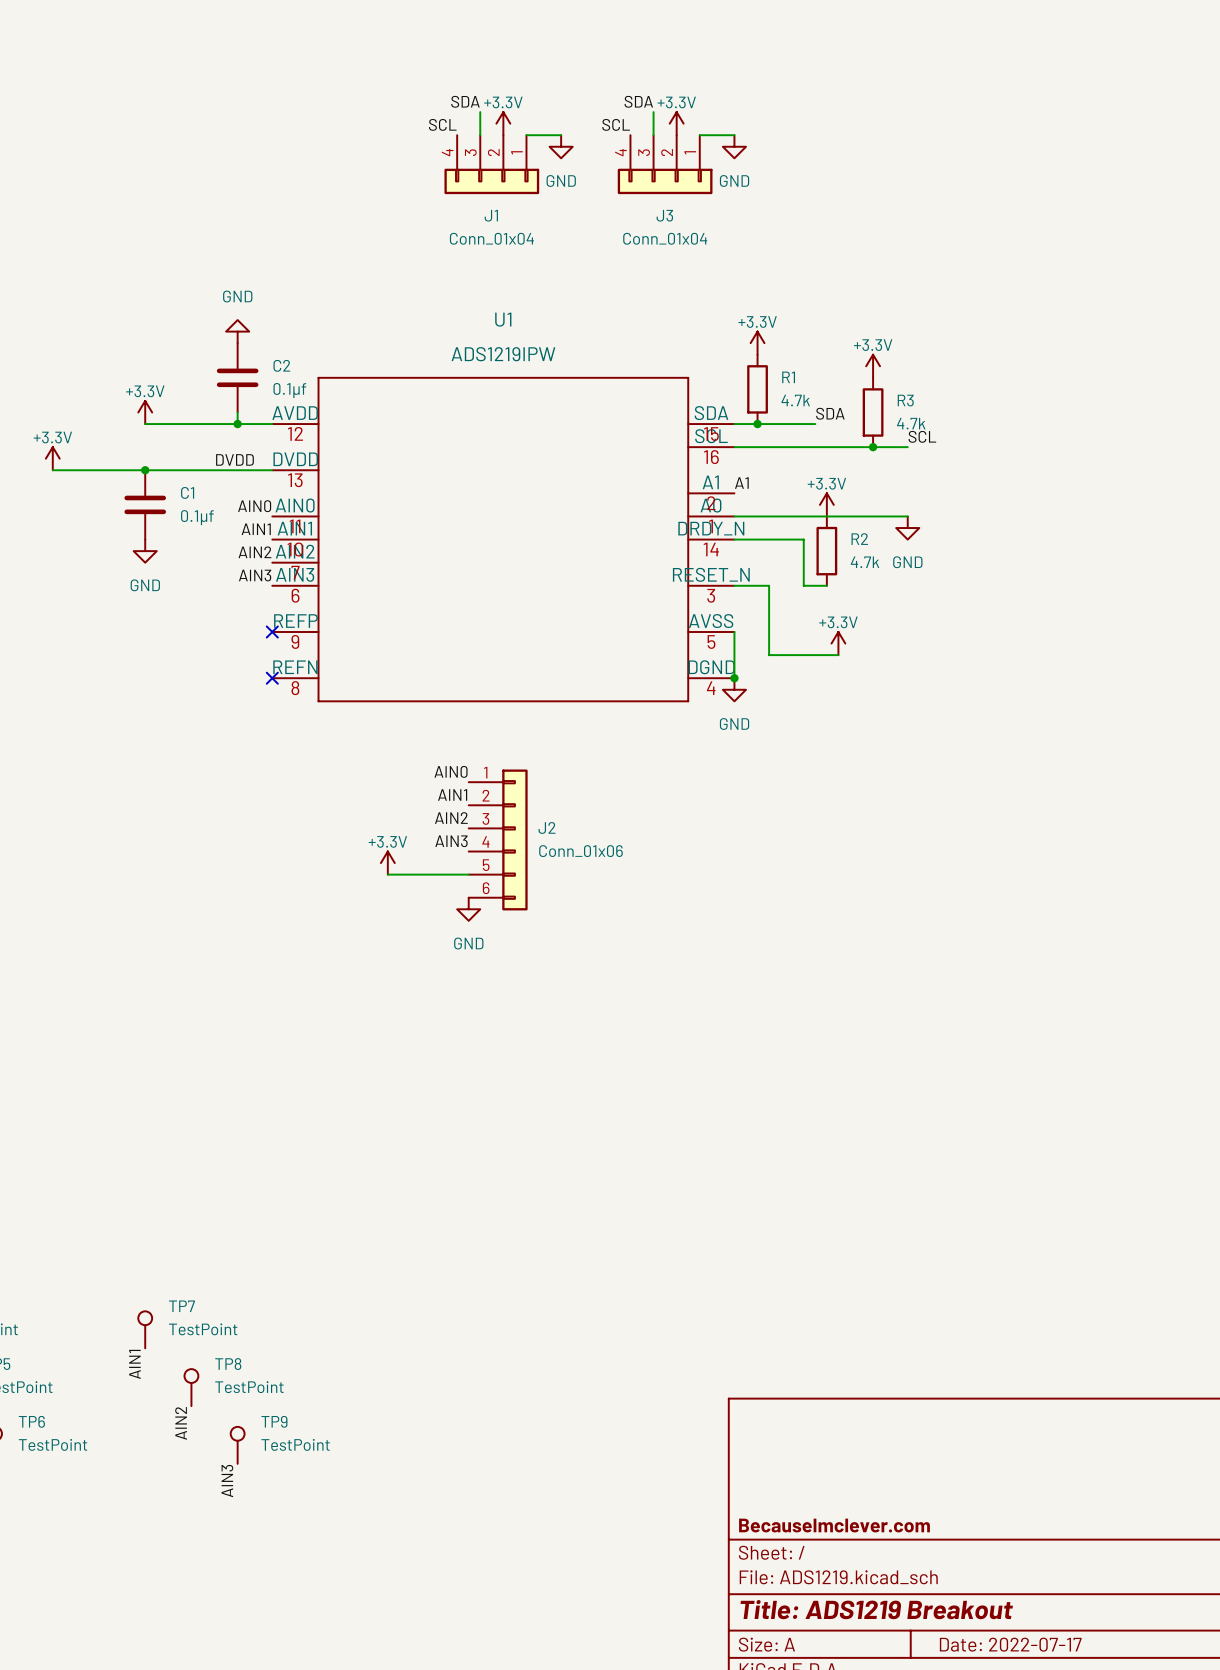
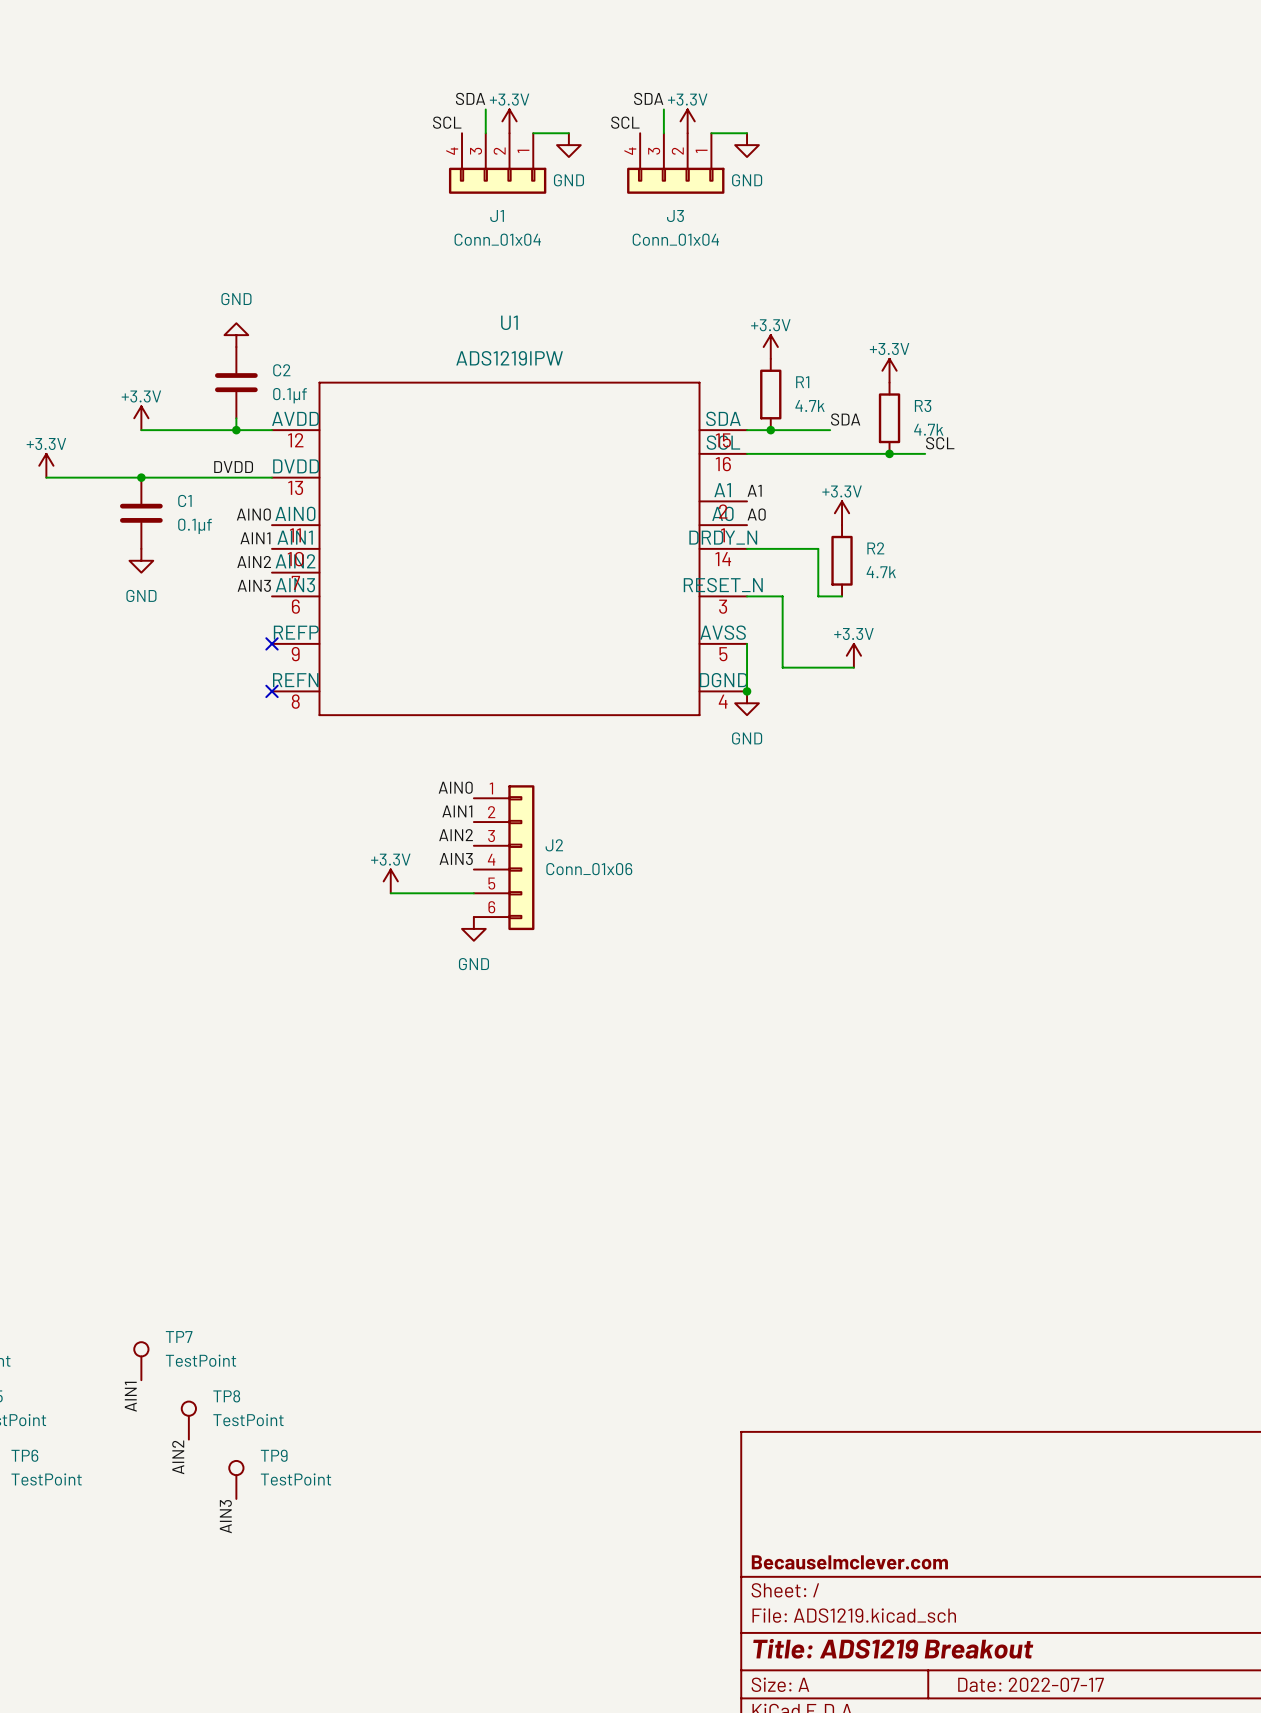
label: none -> A0 (756, 514)
wire: (734, 516) (907, 516) -> none
power symbol: GND (907, 528) -> none

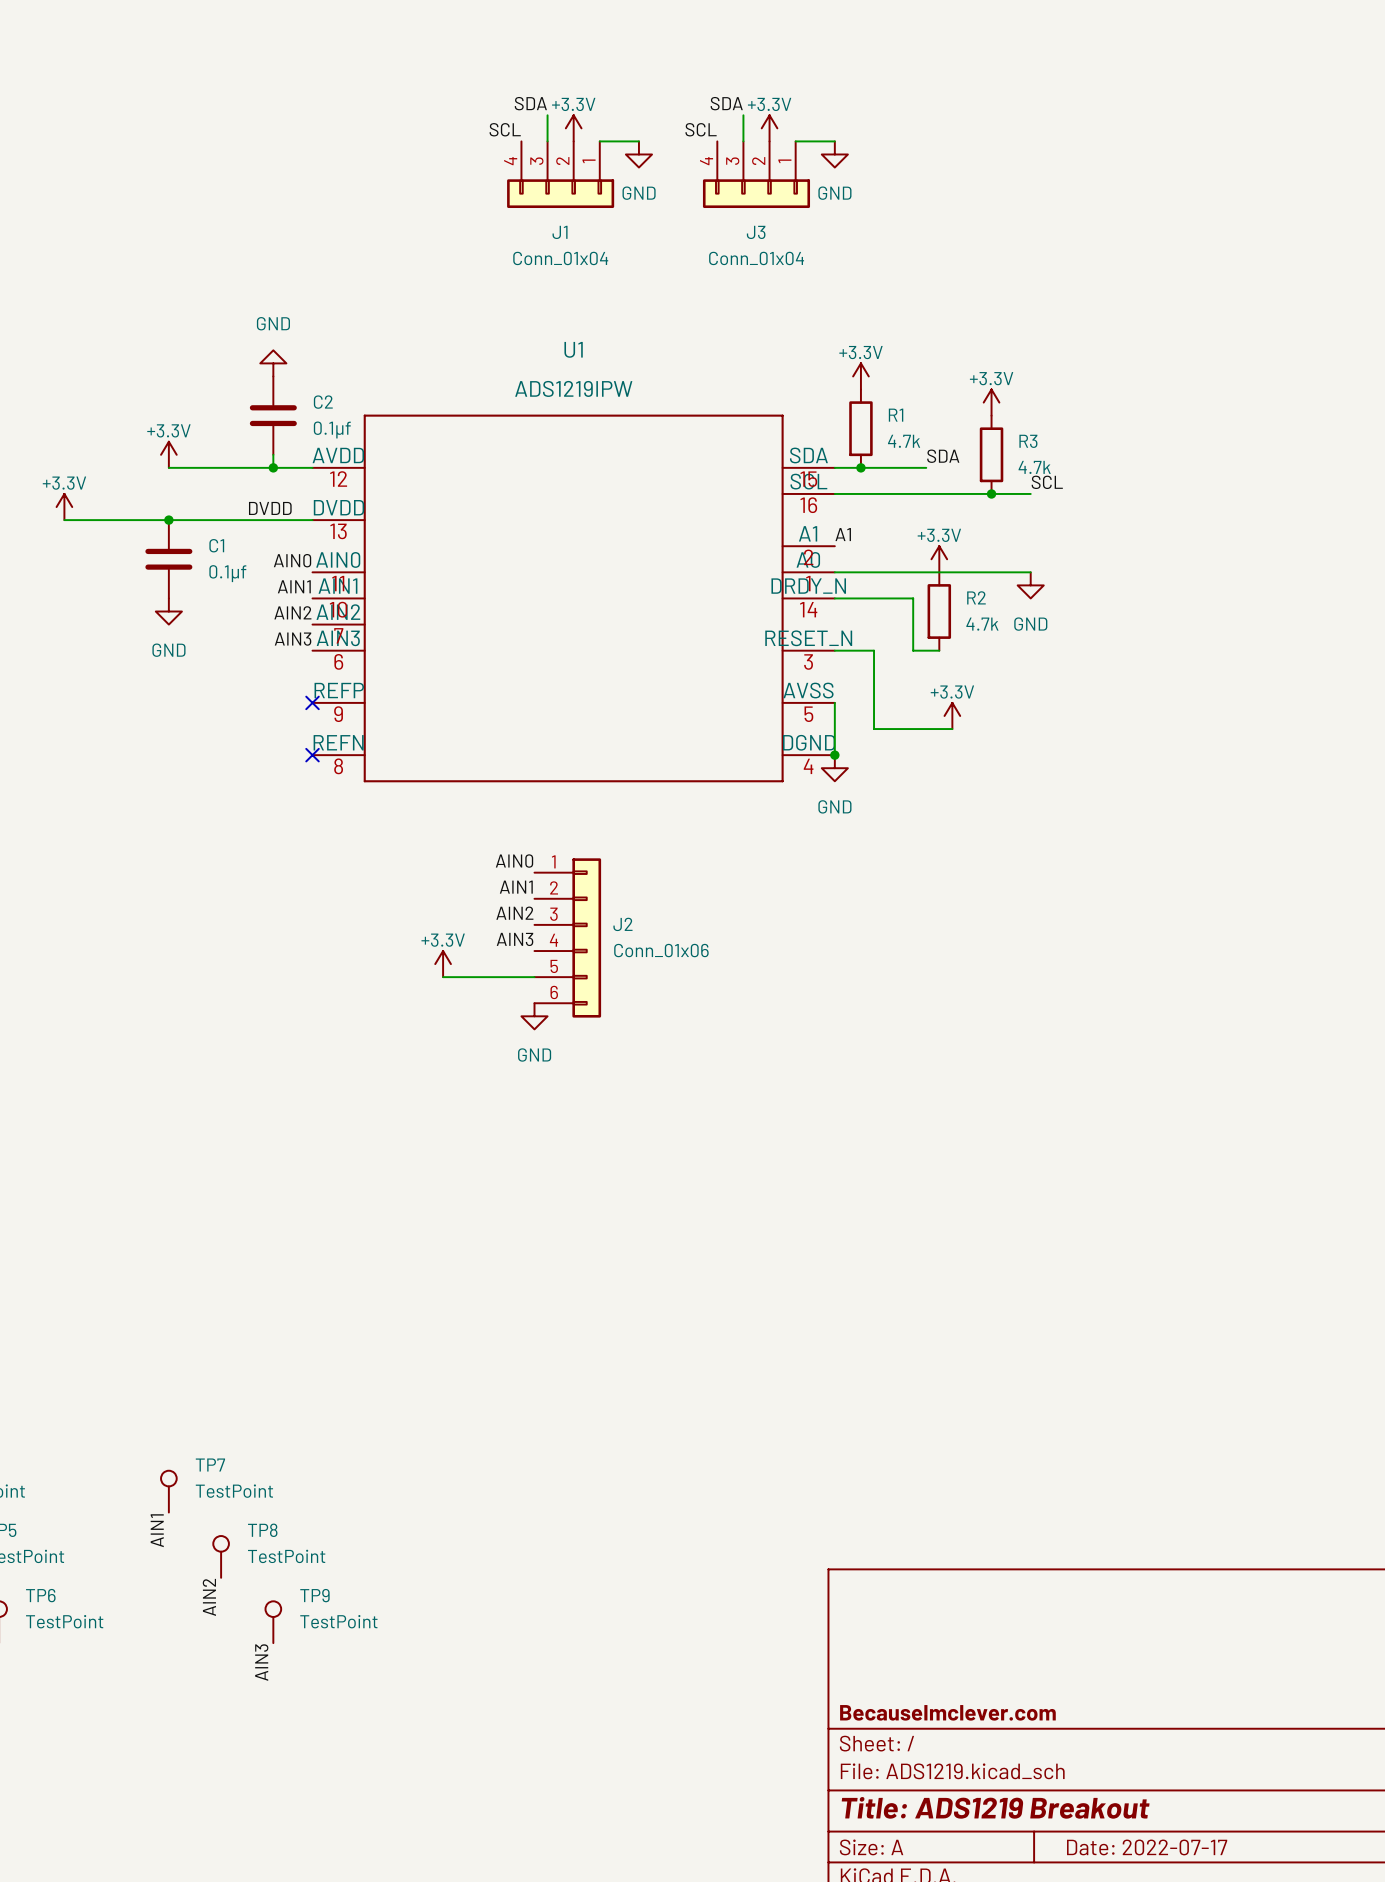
label: A0 (756, 514) -> none
wire: none -> (834, 572) (1030, 572)
power symbol: none -> GND (1030, 585)

